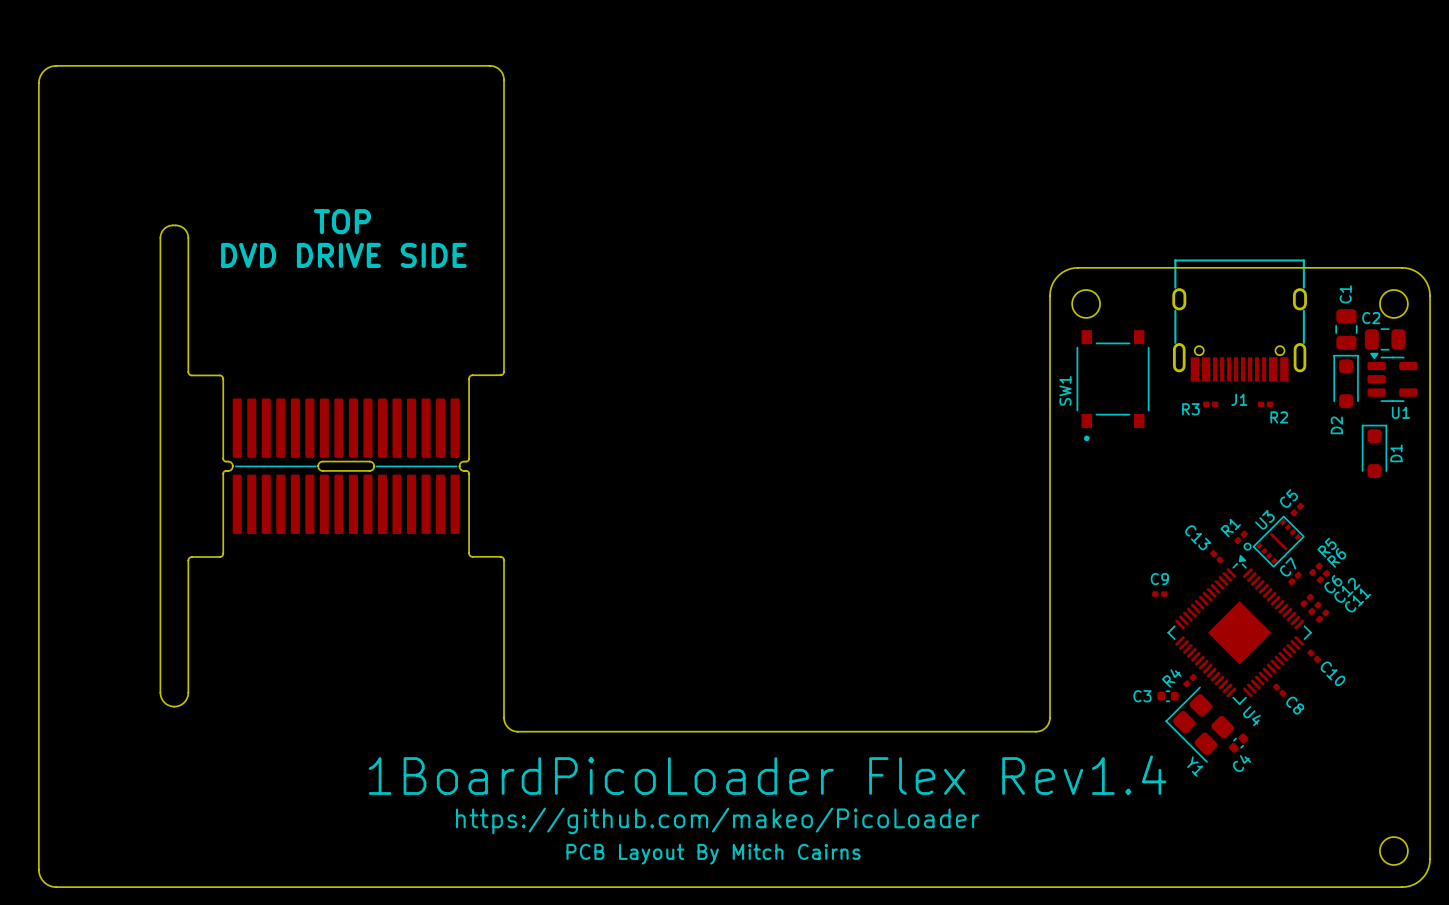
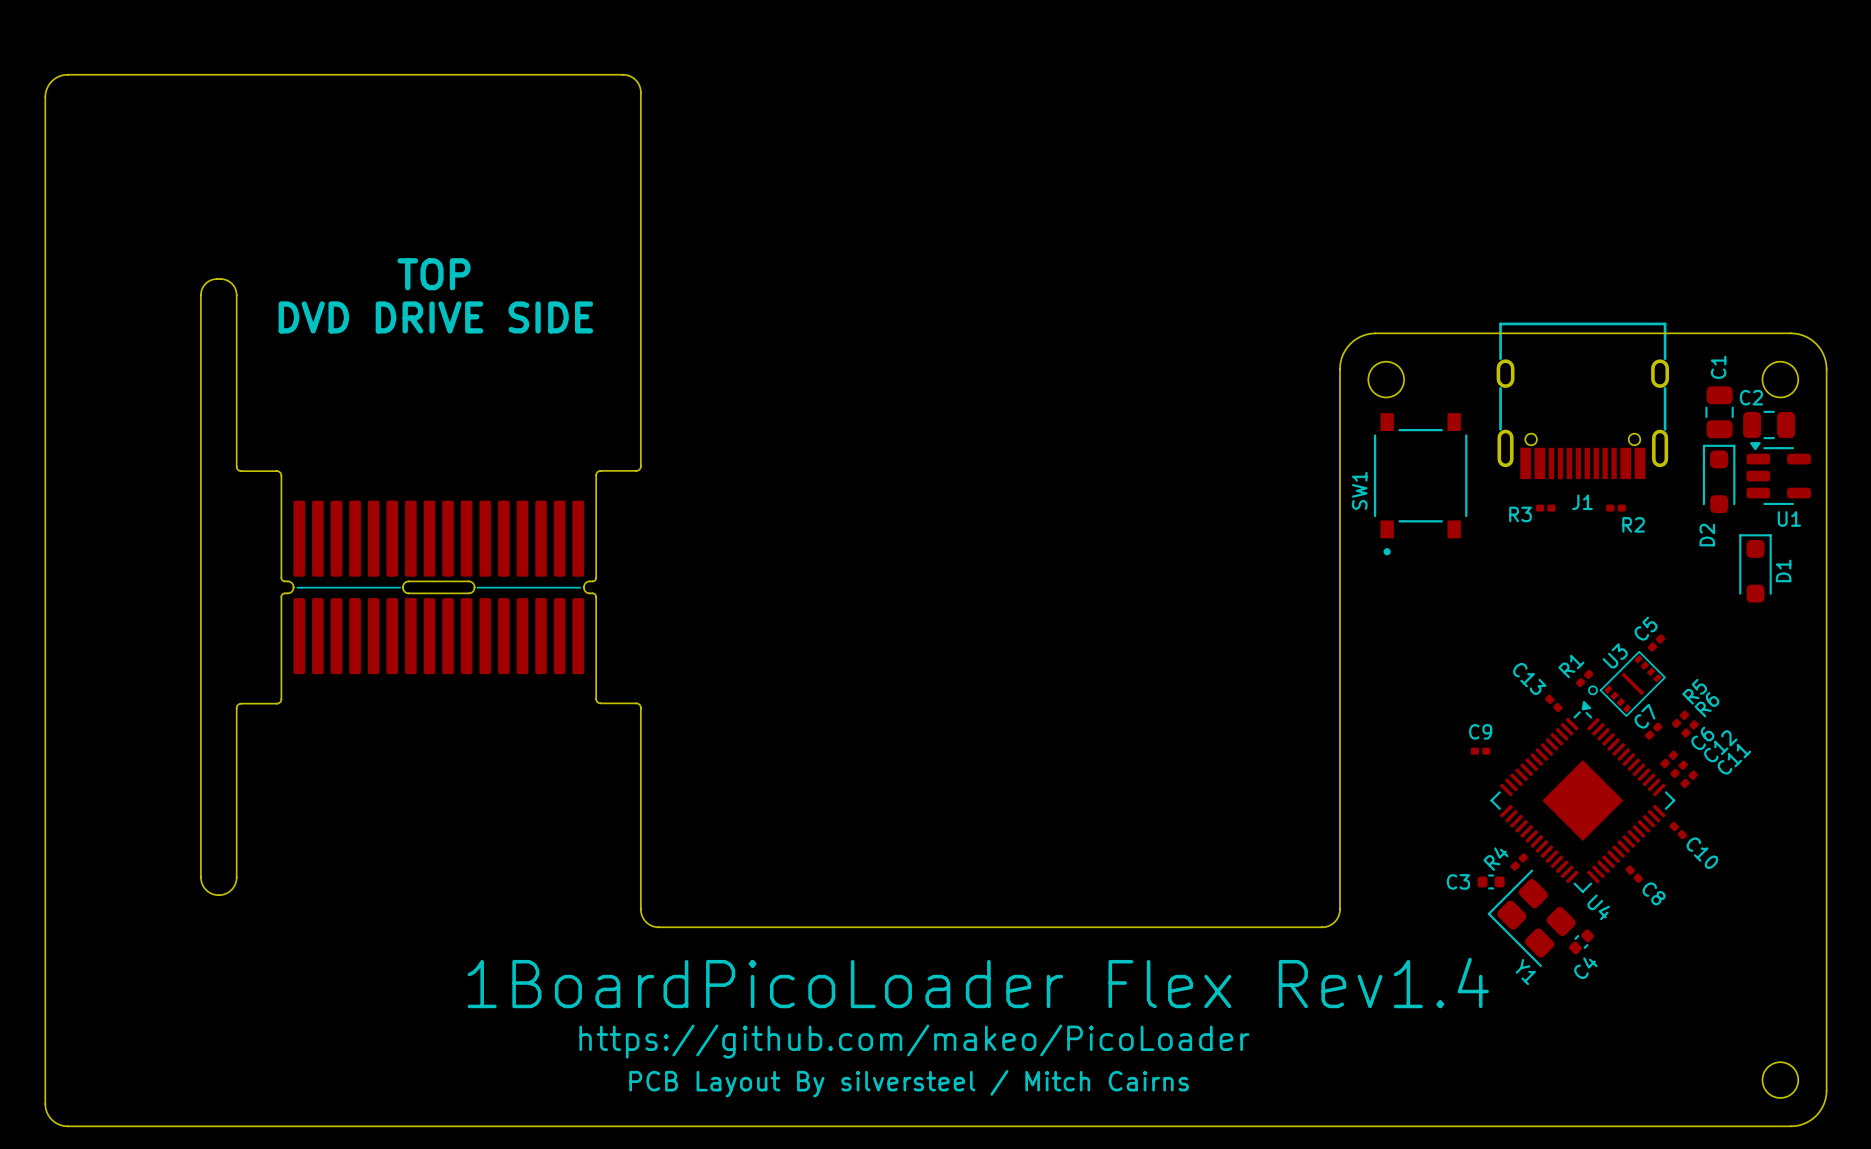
text: PCB Layout By Mitch Cairns (713, 854) -> PCB Layout By silversteel / Mitch Cairns (909, 1083)

